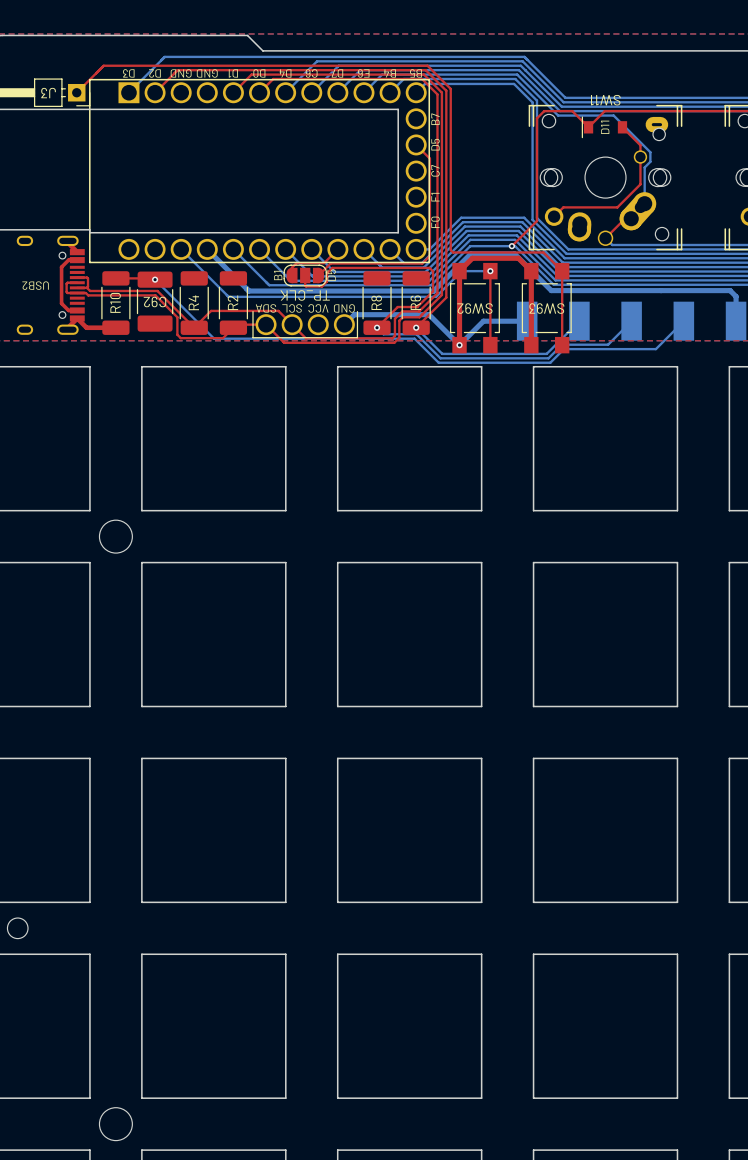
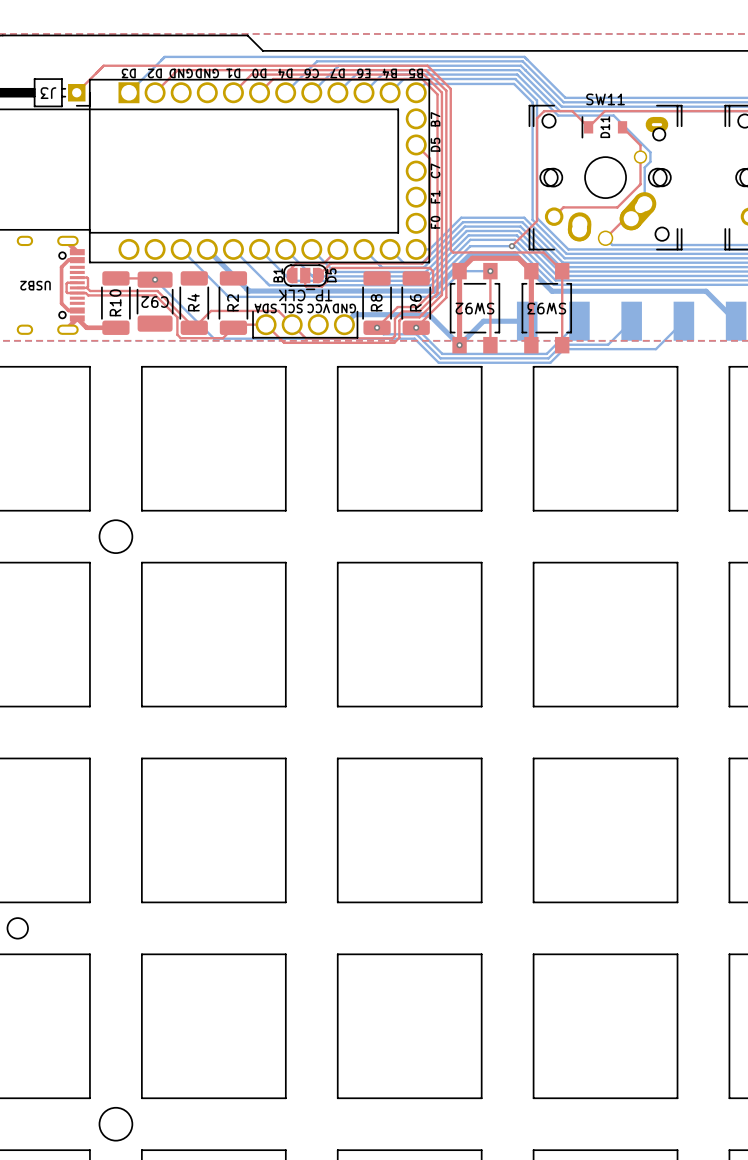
SW11 name rotation: 0° (605, 100) -> 180° (605, 99)
bottom track: (551, 290) (730, 290) (736, 296) (736, 321) -> (551, 290) (706, 291) (736, 321)

